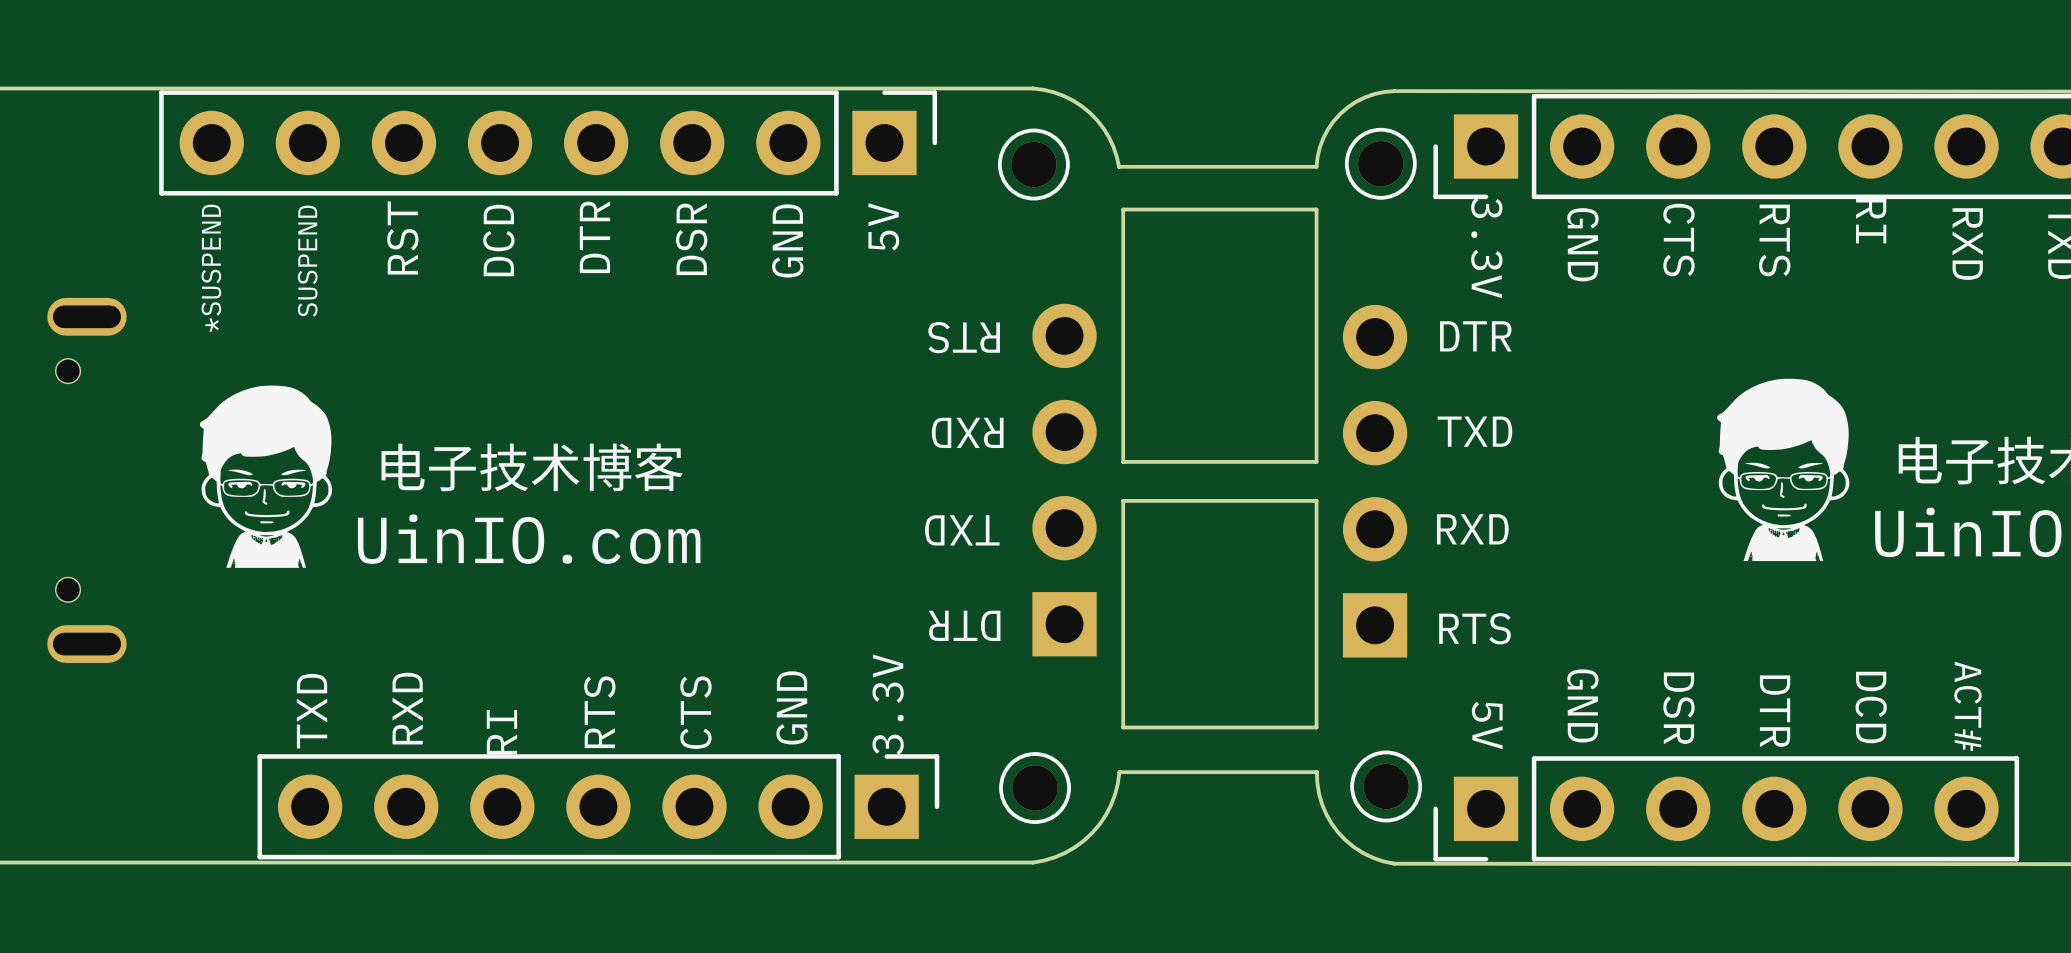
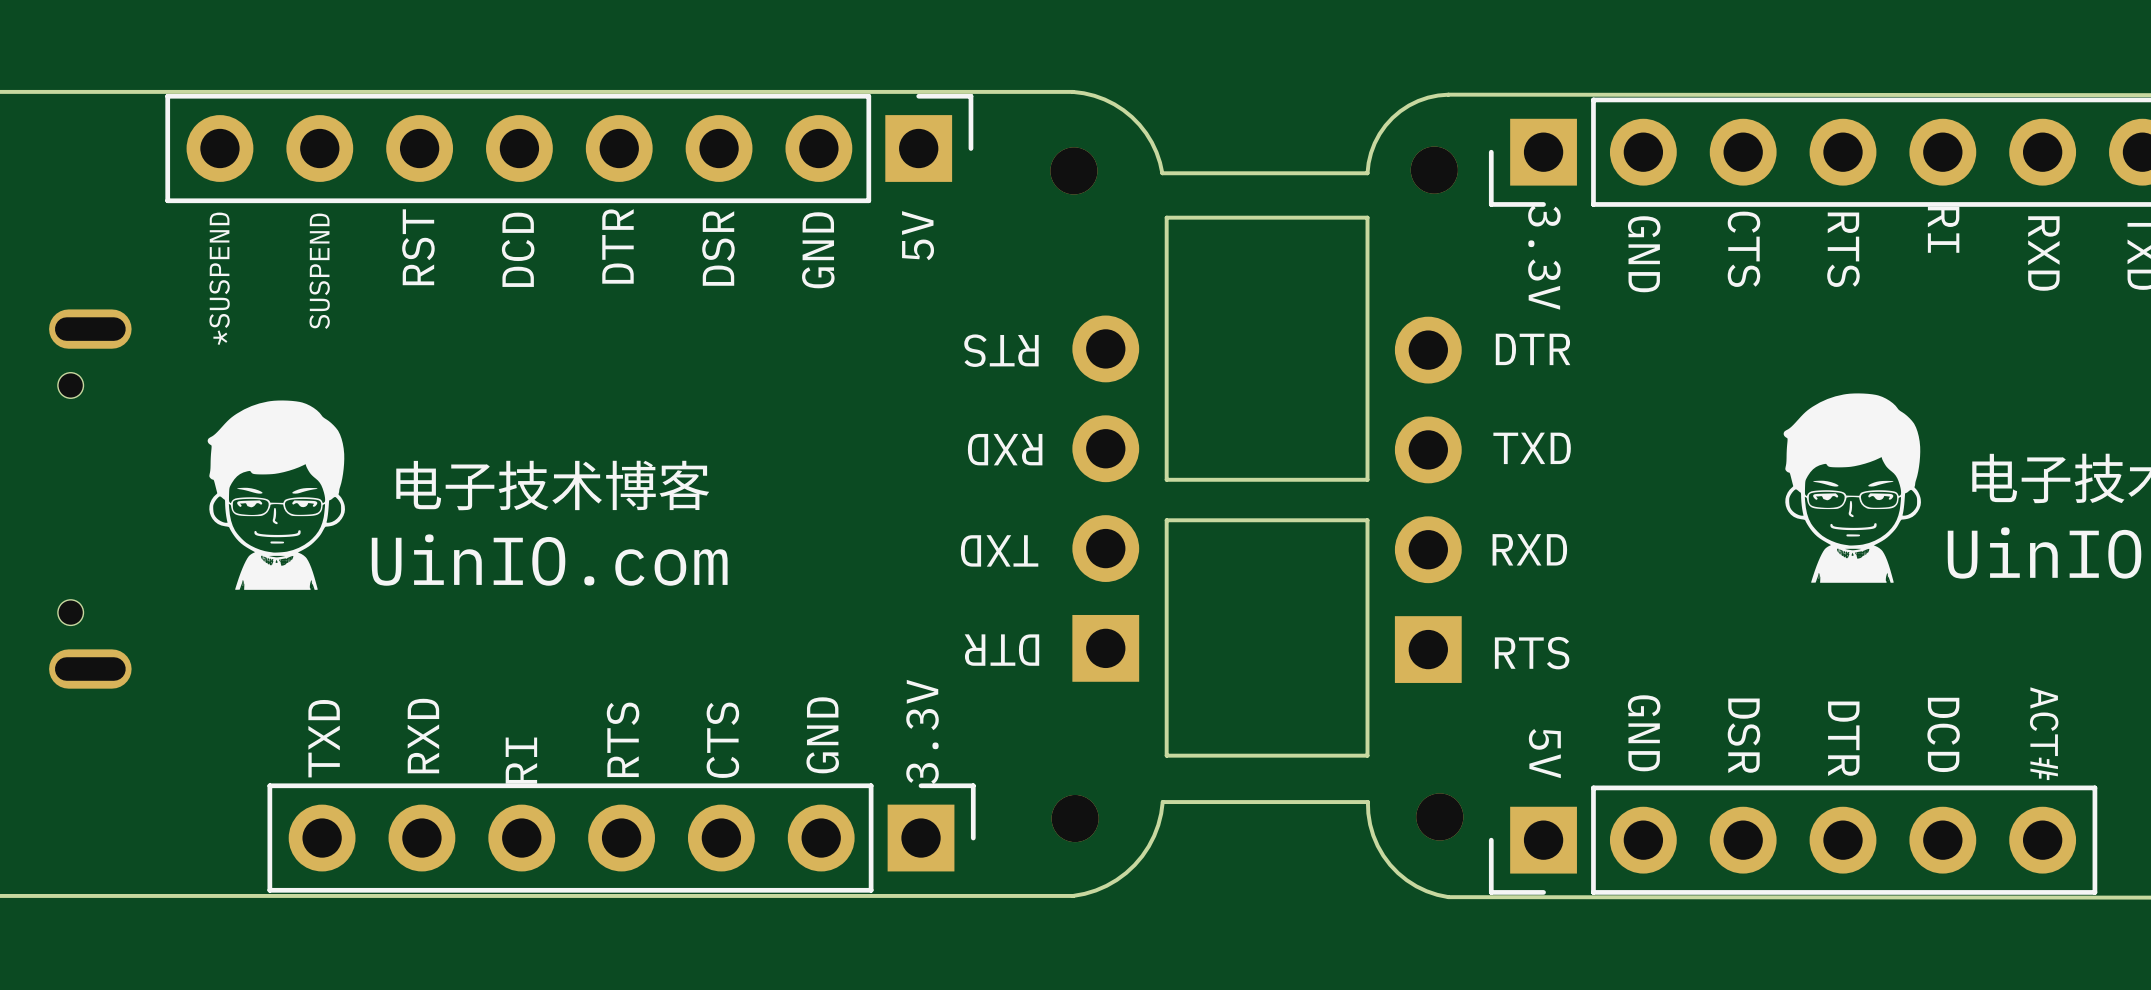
part footprint: [1344, 127, 1417, 200] -> [1410, 146, 1458, 194]
part footprint: [997, 128, 1070, 201] -> [1050, 147, 1098, 195]
part footprint: [1350, 750, 1423, 823] -> [1416, 793, 1464, 841]
part footprint: [999, 752, 1071, 824] -> [1051, 794, 1099, 843]

